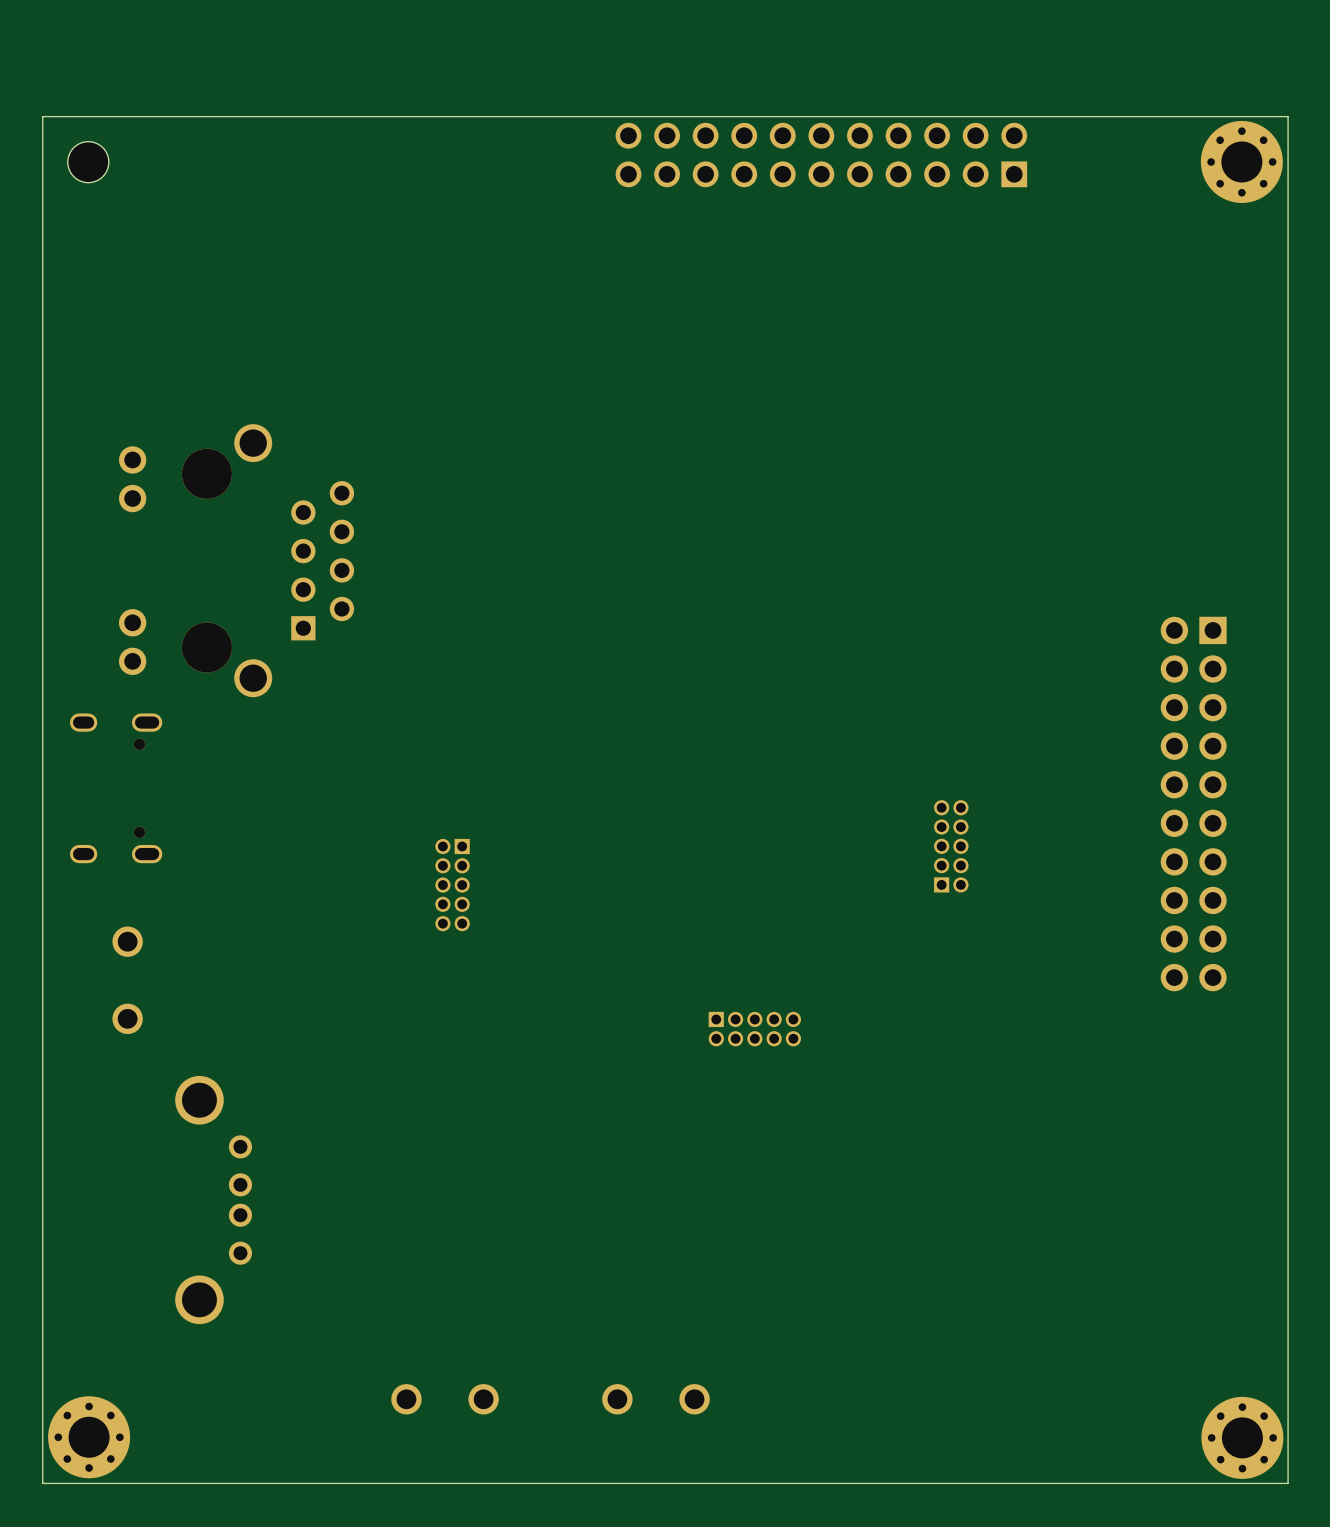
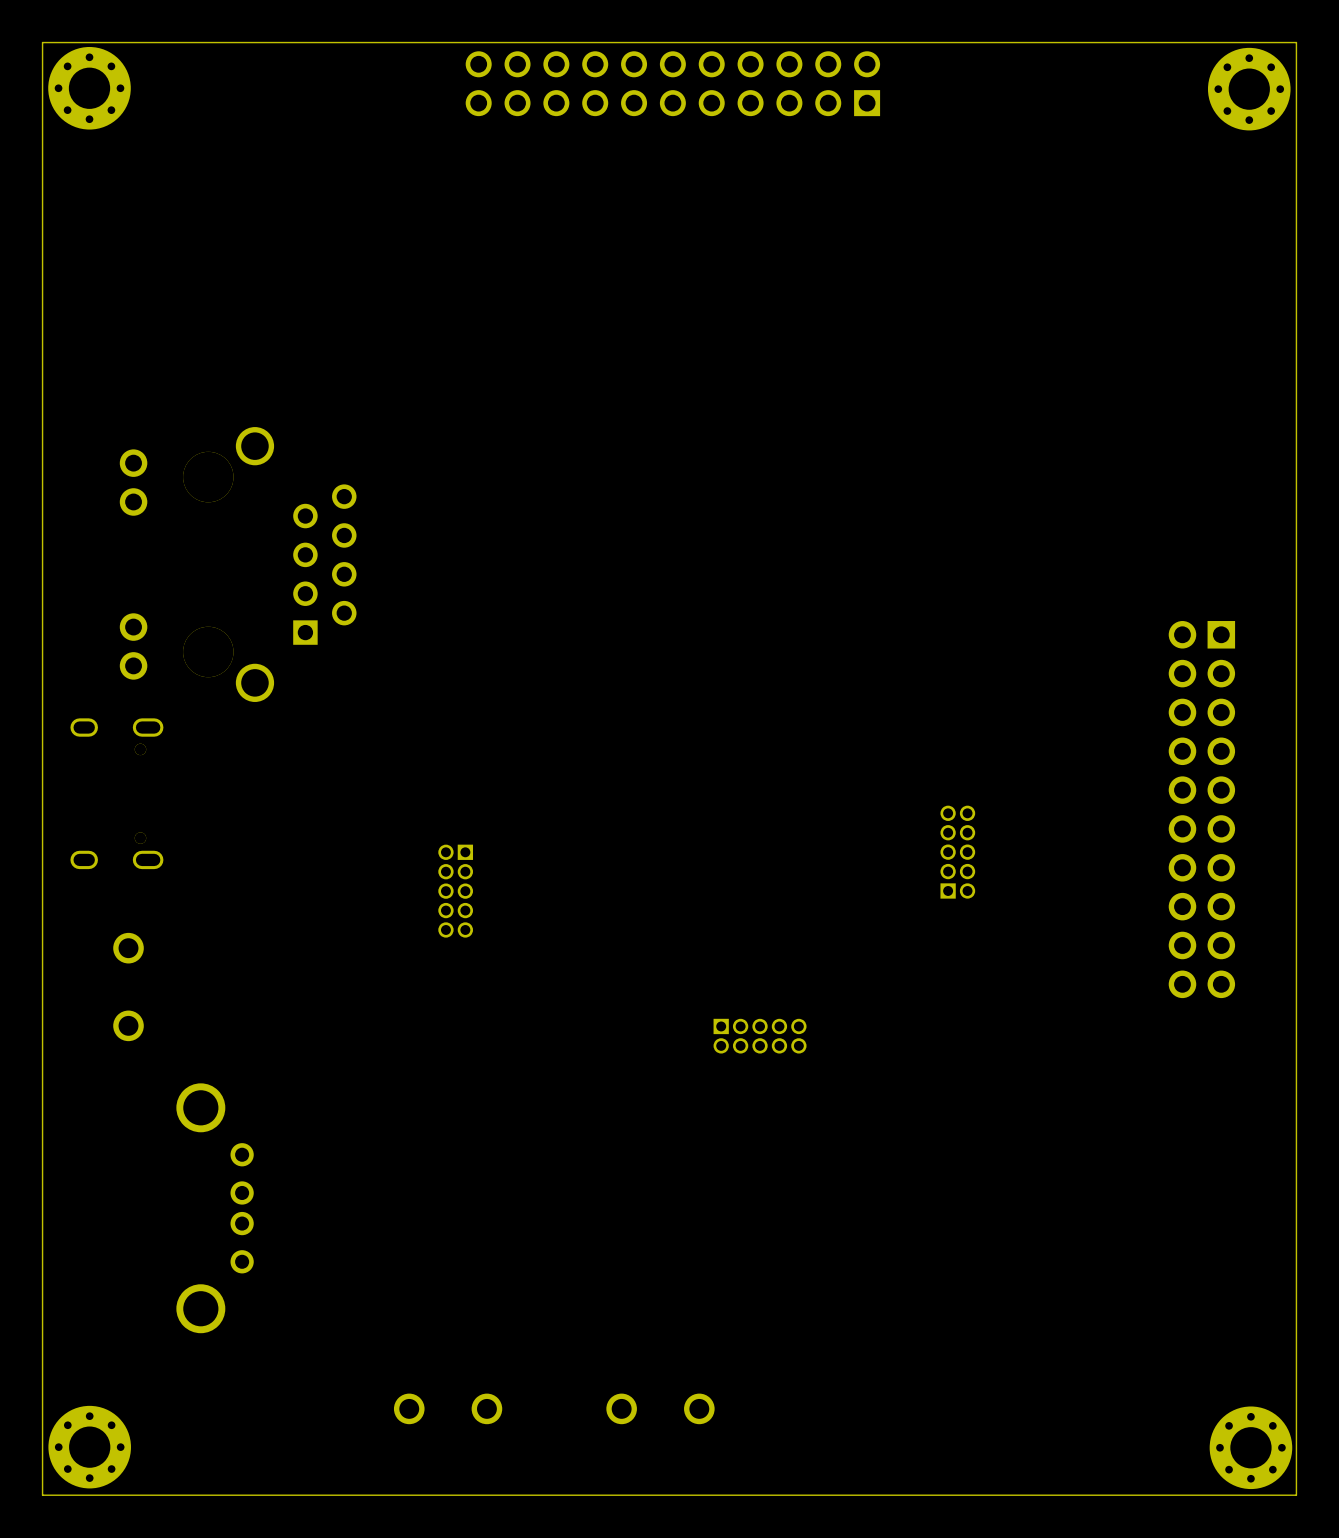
part: none -> (89, 88)
board edge: (1288, 116) (42, 116) (42, 1483) (1288, 1483) (1288, 116) -> (1296, 42) (1296, 1495) (42, 1495) (42, 42) (1296, 42)
part position: (821, 155) -> (672, 83)
part position: (1241, 161) -> (1249, 89)
part: (88, 162) -> none

